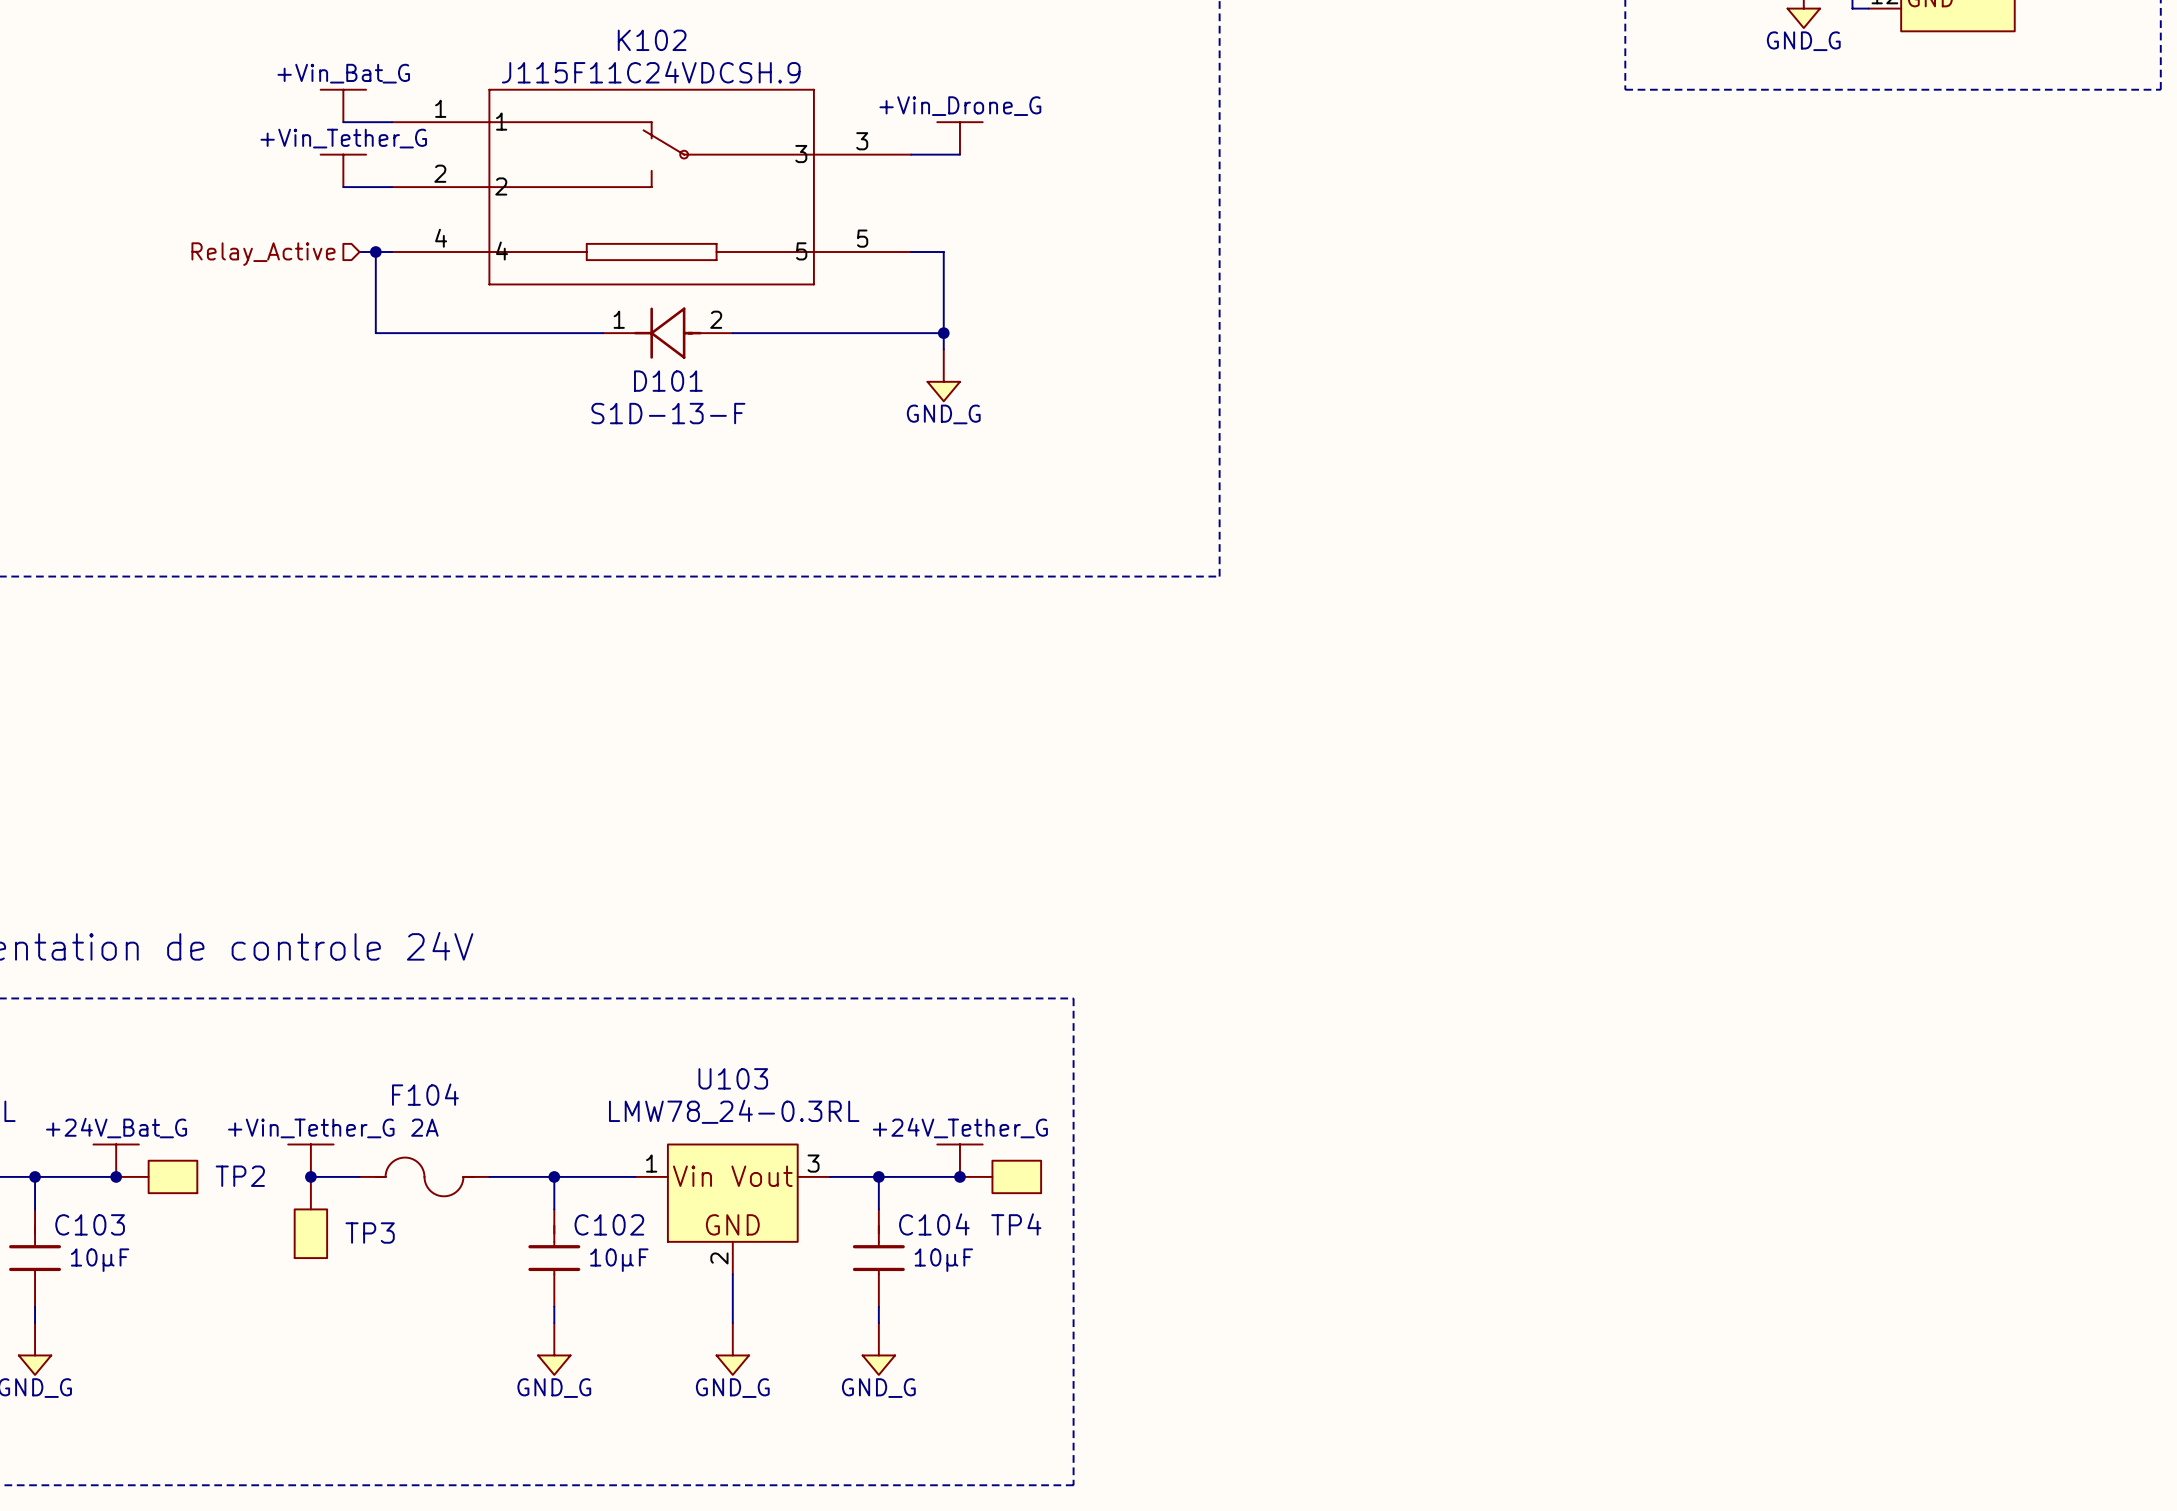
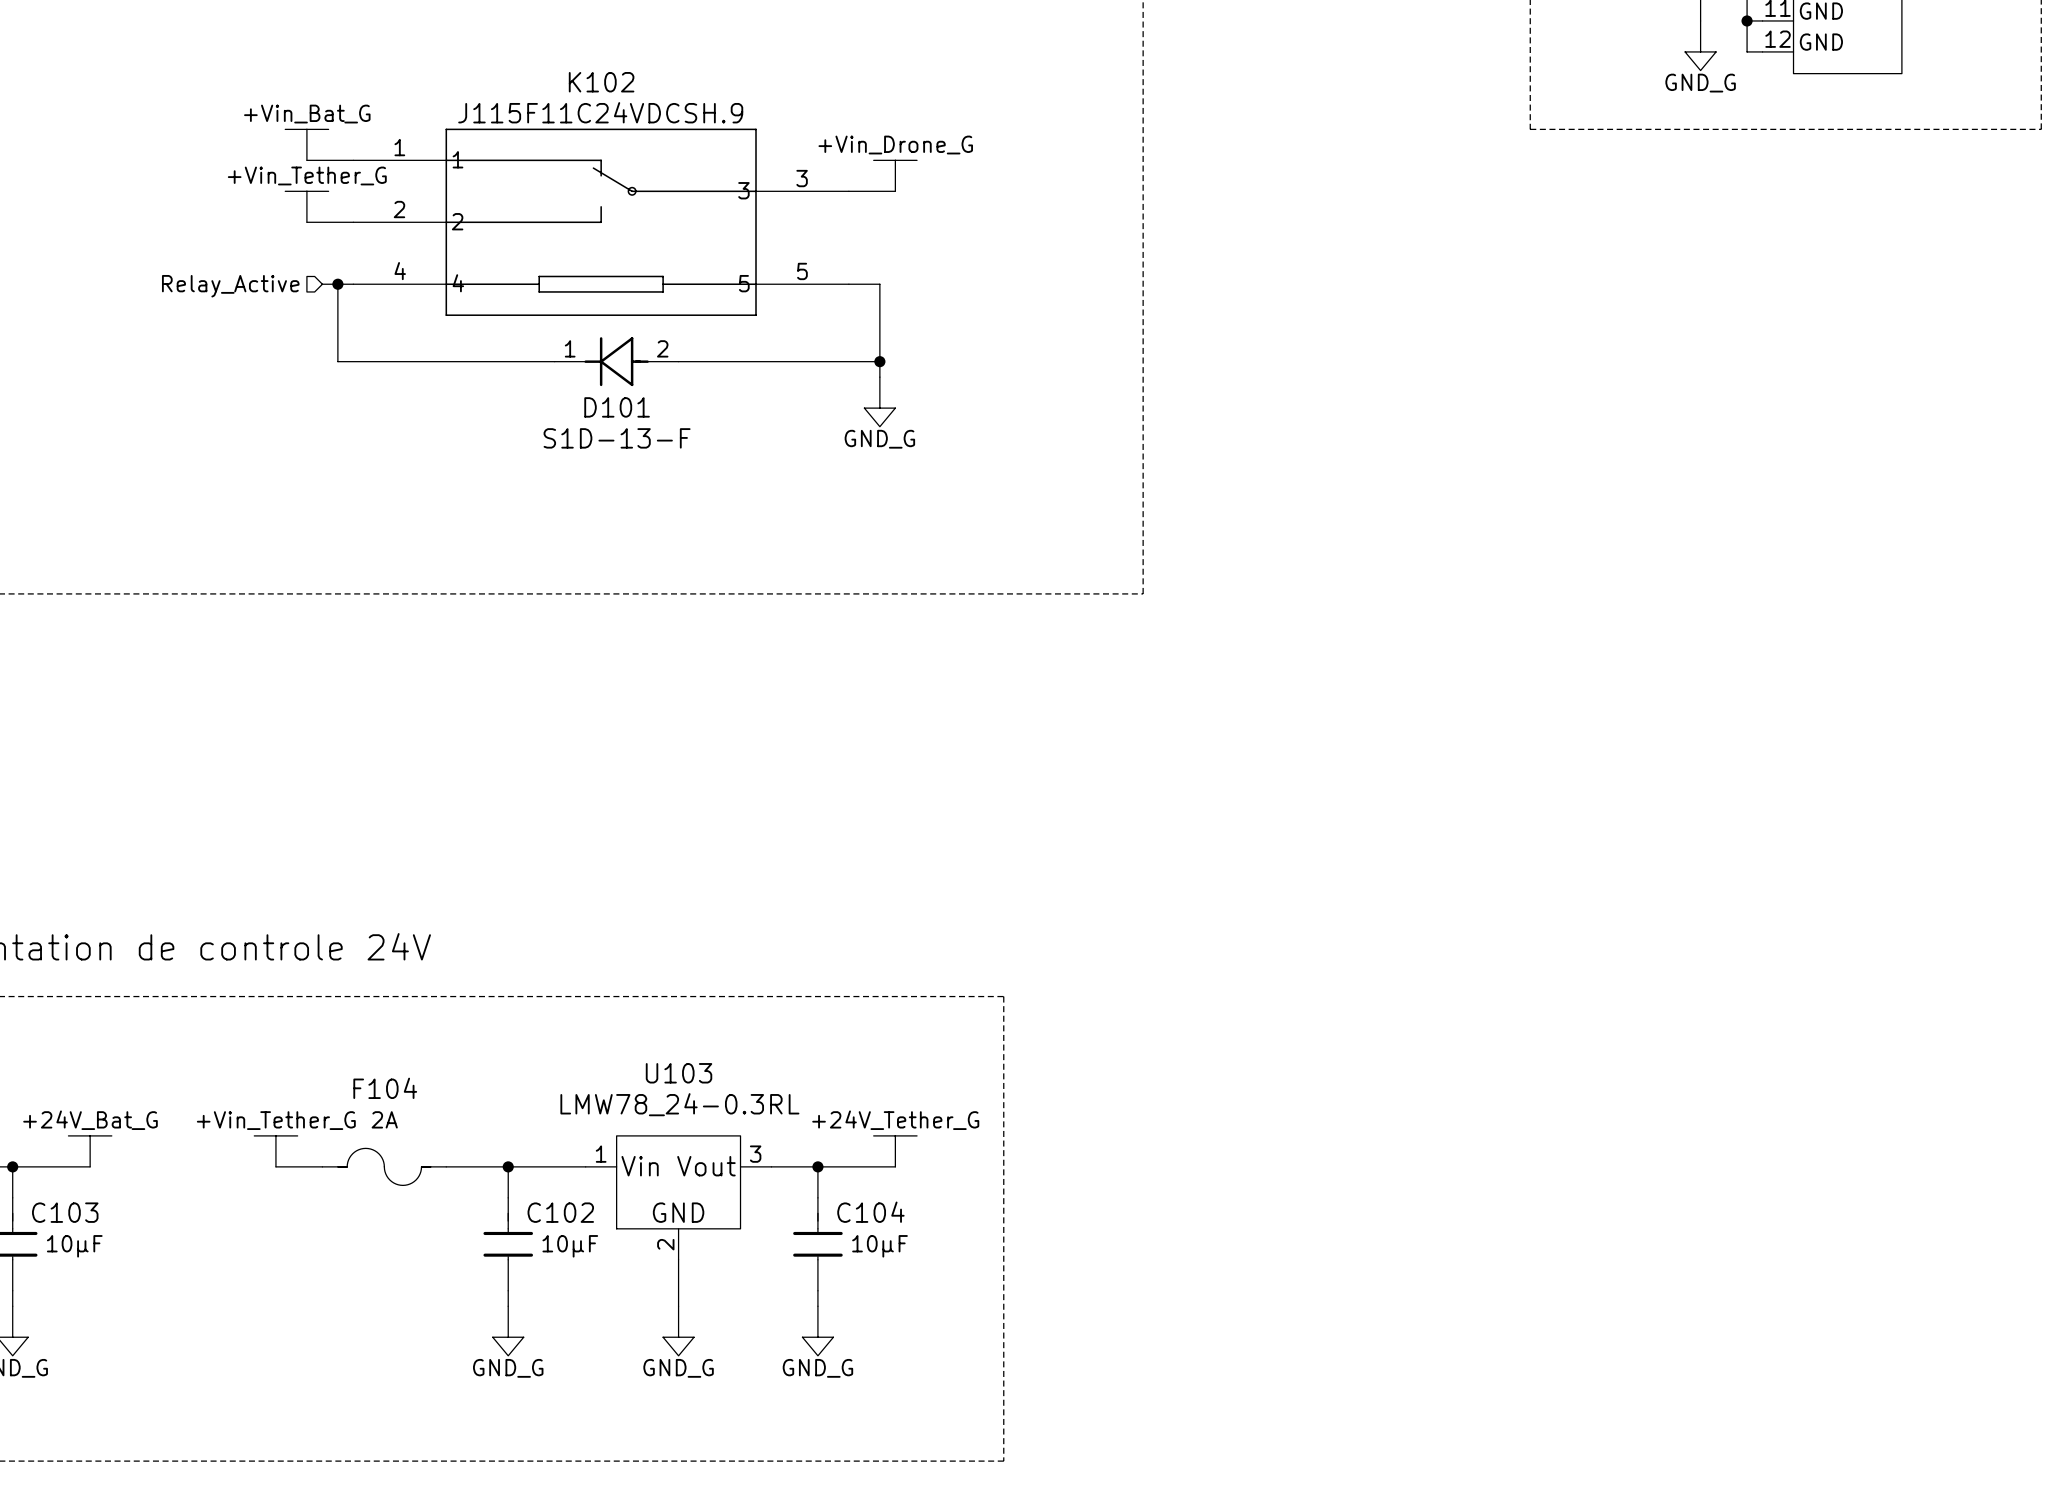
junction: (116, 1176) -> none
TP2: (156, 1176) -> none
junction: (310, 1176) -> none
junction: (959, 1176) -> none
TP4: (1000, 1176) -> none
TP3: (310, 1217) -> none

